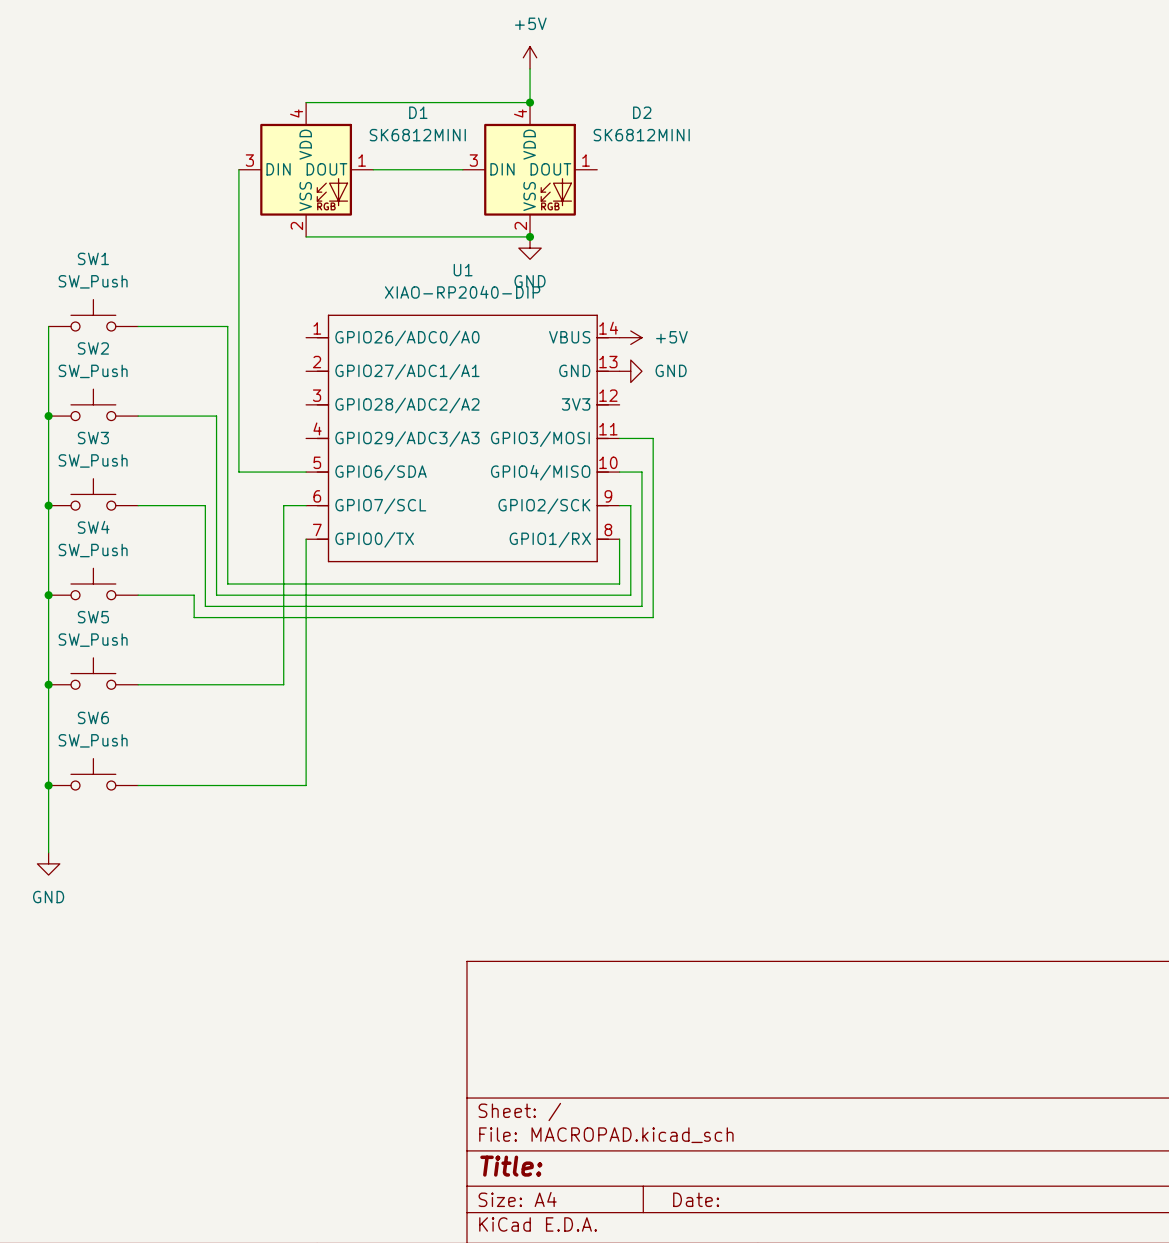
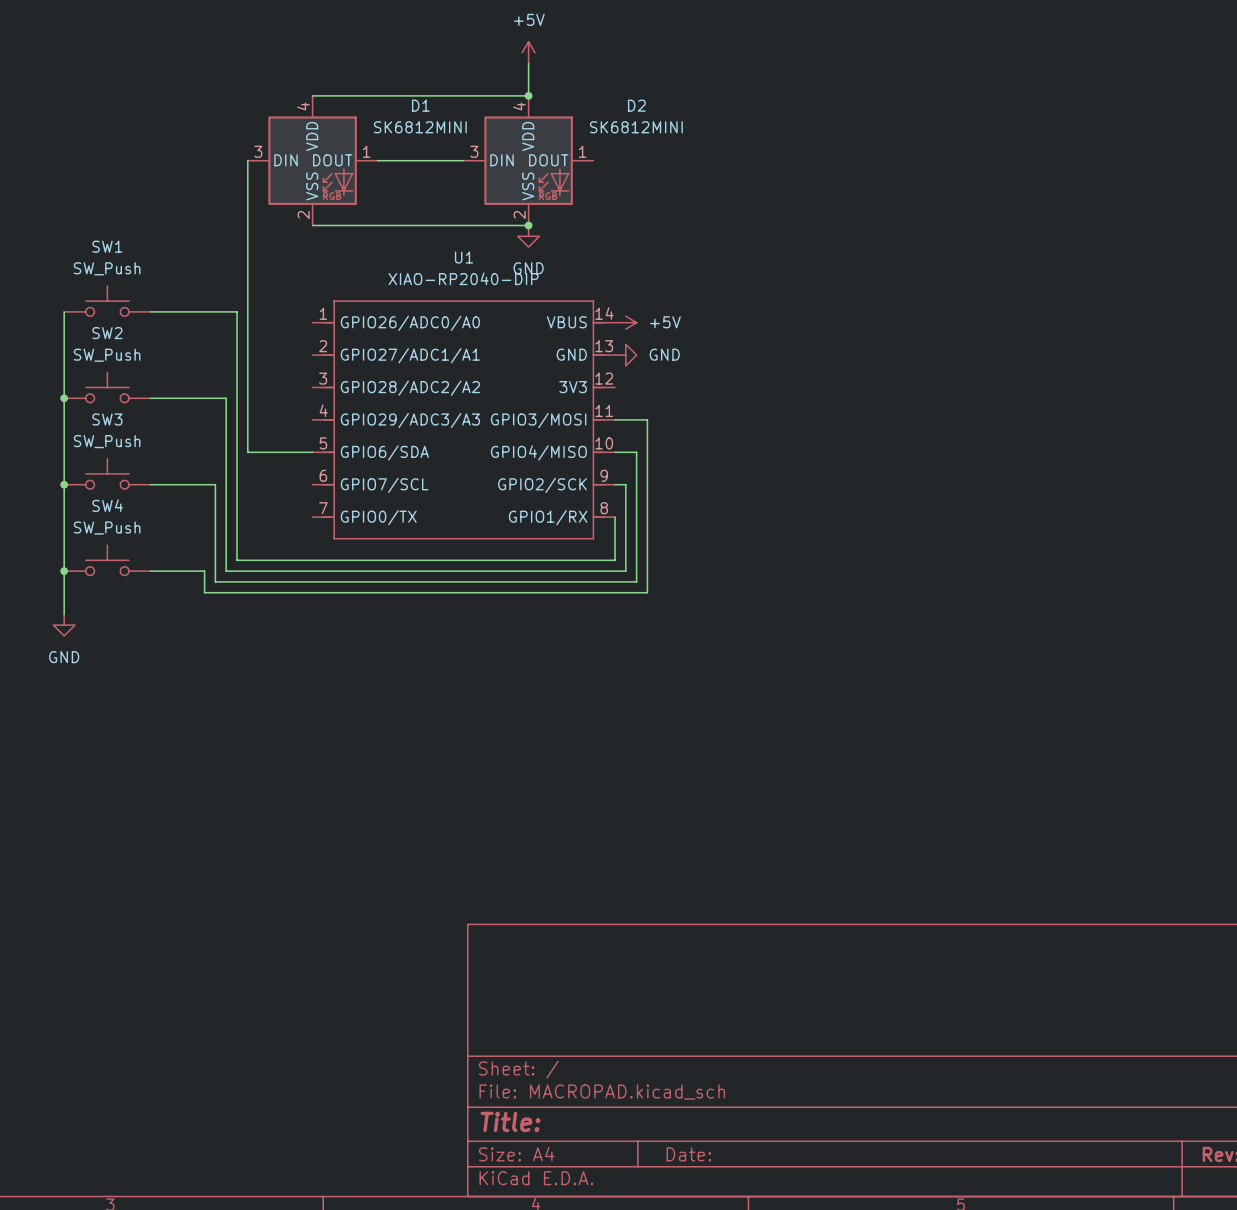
wire: (306, 505) (283, 505) (283, 684) (138, 684) -> none
wire: (306, 539) (306, 785) (138, 785) -> none
wire: (48, 639) (48, 852) -> none
SW5: SW_Push (93, 673) -> none
junction: (48, 684) -> none
SW6: SW_Push (93, 774) -> none
junction: (48, 785) -> none
power symbol position: GND (48, 863) -> GND (64, 625)

